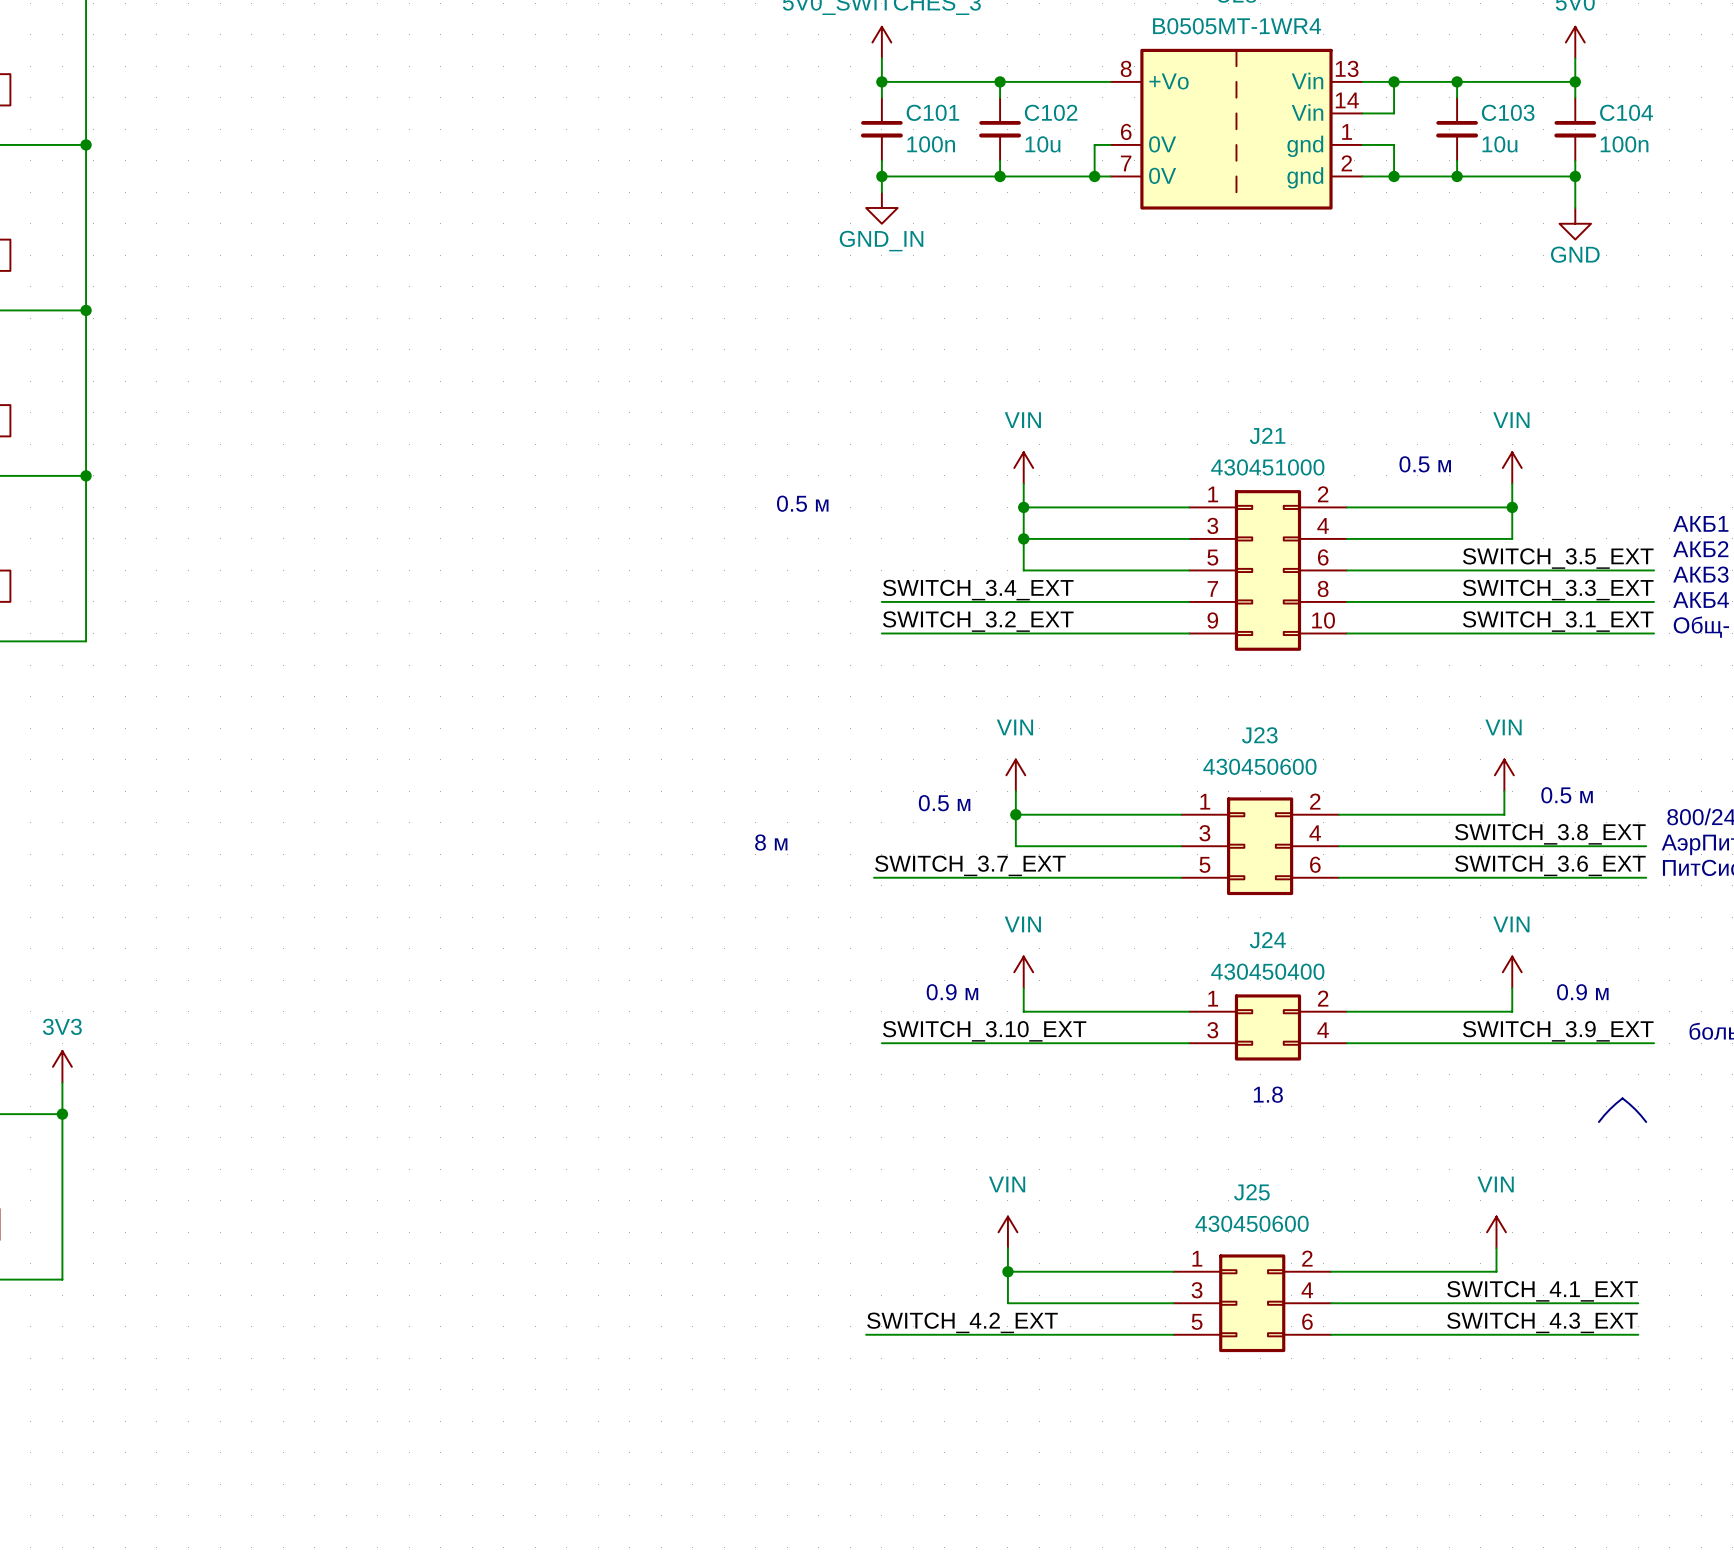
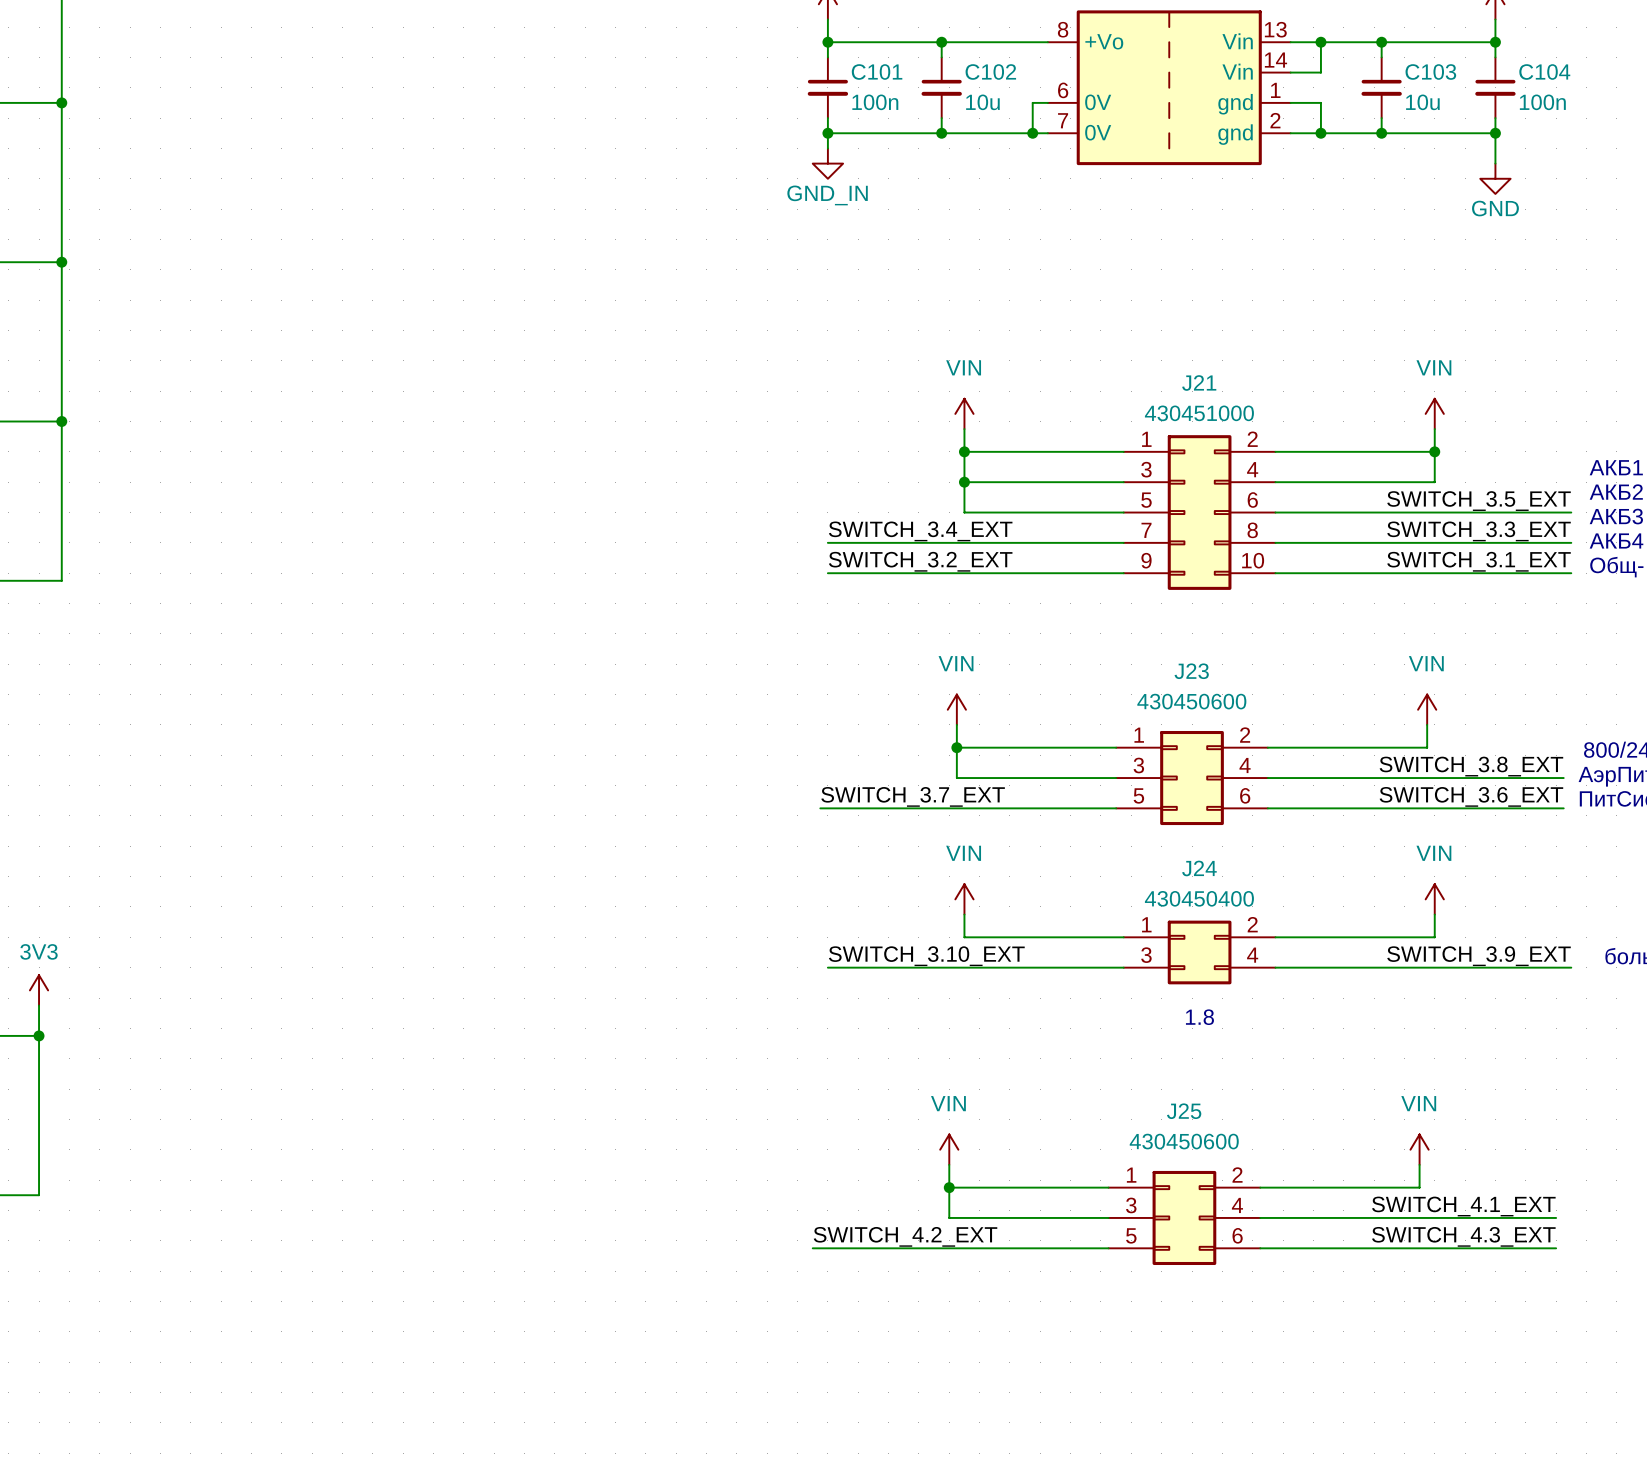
text: 0.5 м (1425, 464) -> none
text: 0.5 м (802, 503) -> none
text: 0.5 м (1567, 795) -> none
text: 0.5 м (944, 803) -> none
text: 8 м (771, 842) -> none
text: 0.9 м (952, 992) -> none
text: 0.9 м (1582, 992) -> none
line: (1598, 1122) (1622, 1098) (1646, 1122) -> none

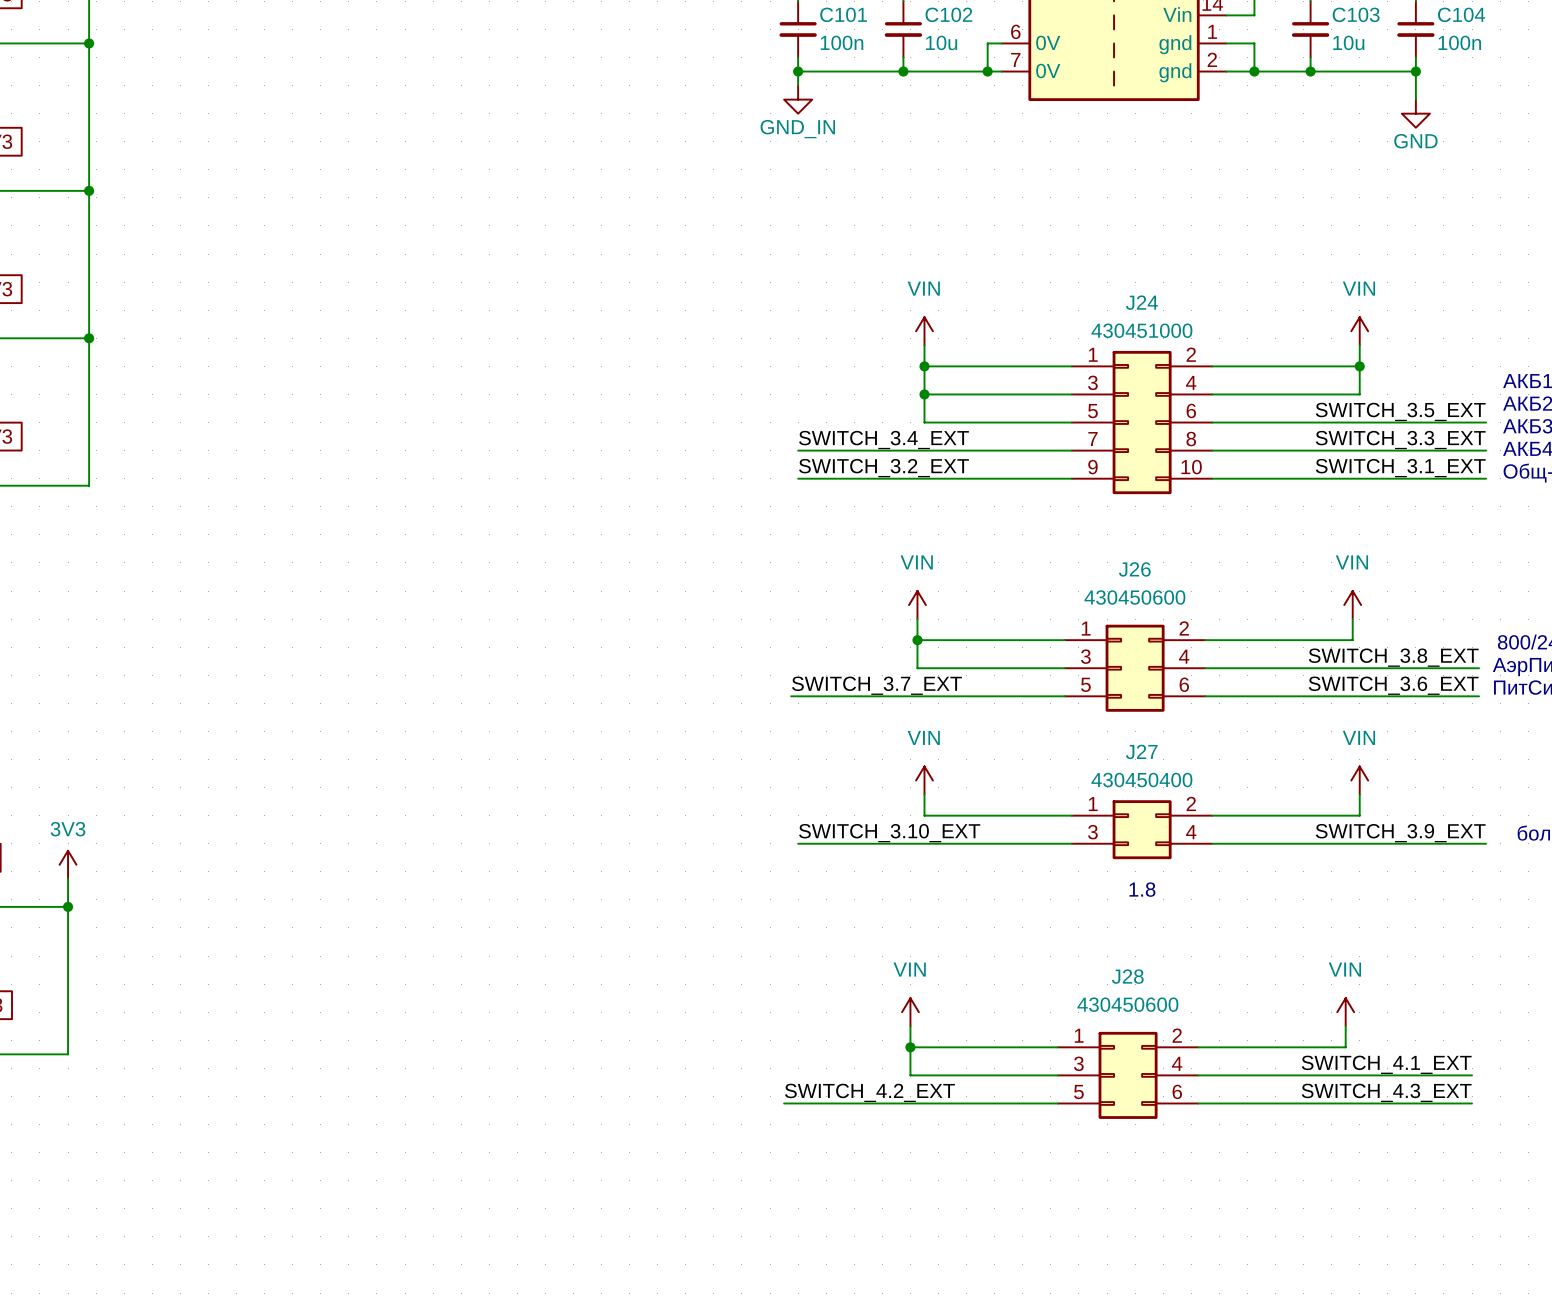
J21 name: J21 (1199, 383) -> J24 (1141, 302)
J23 name: J23 (1191, 671) -> J26 (1134, 569)
J24 name: J24 (1199, 868) -> J27 (1141, 751)
J25 name: J25 (1184, 1111) -> J28 (1127, 976)

